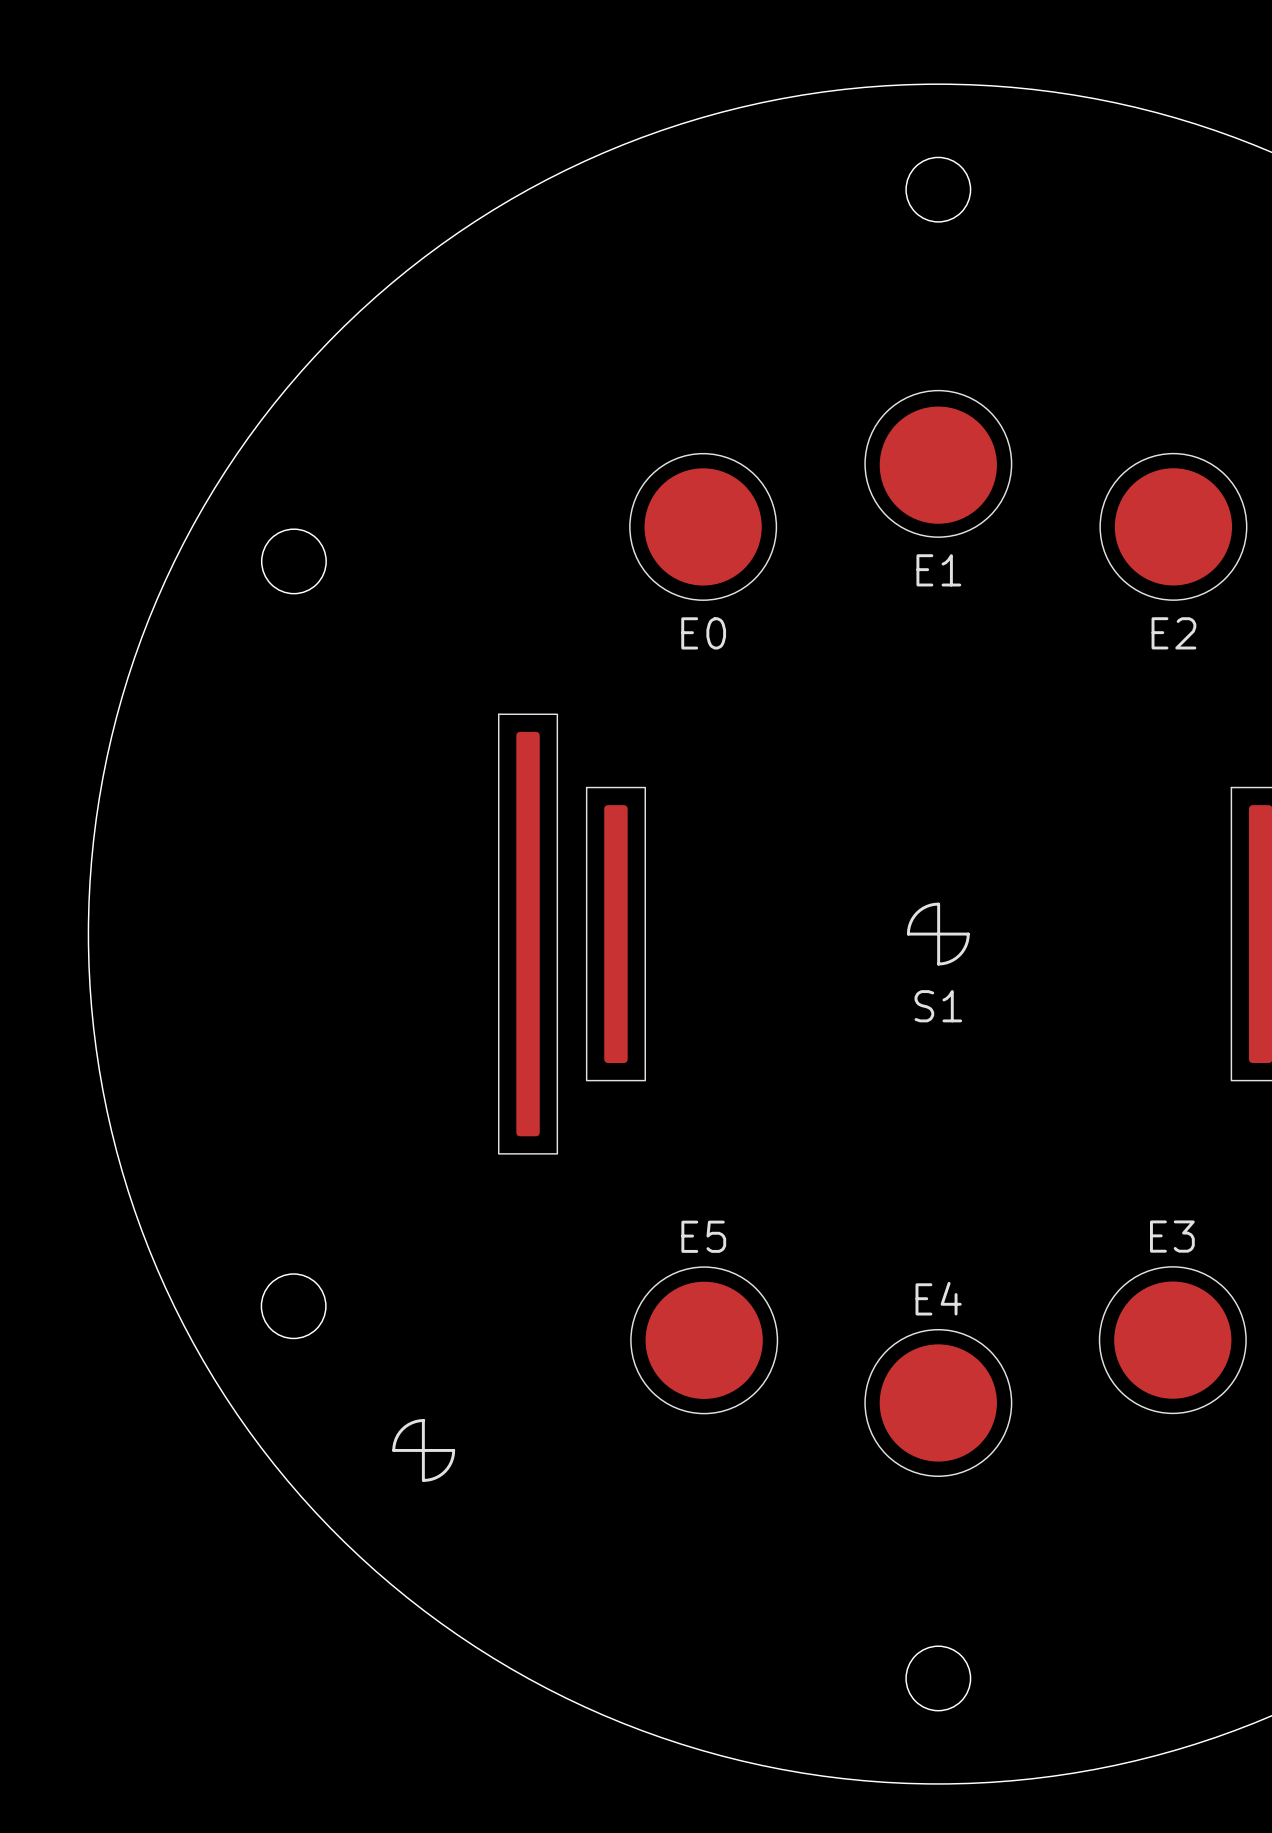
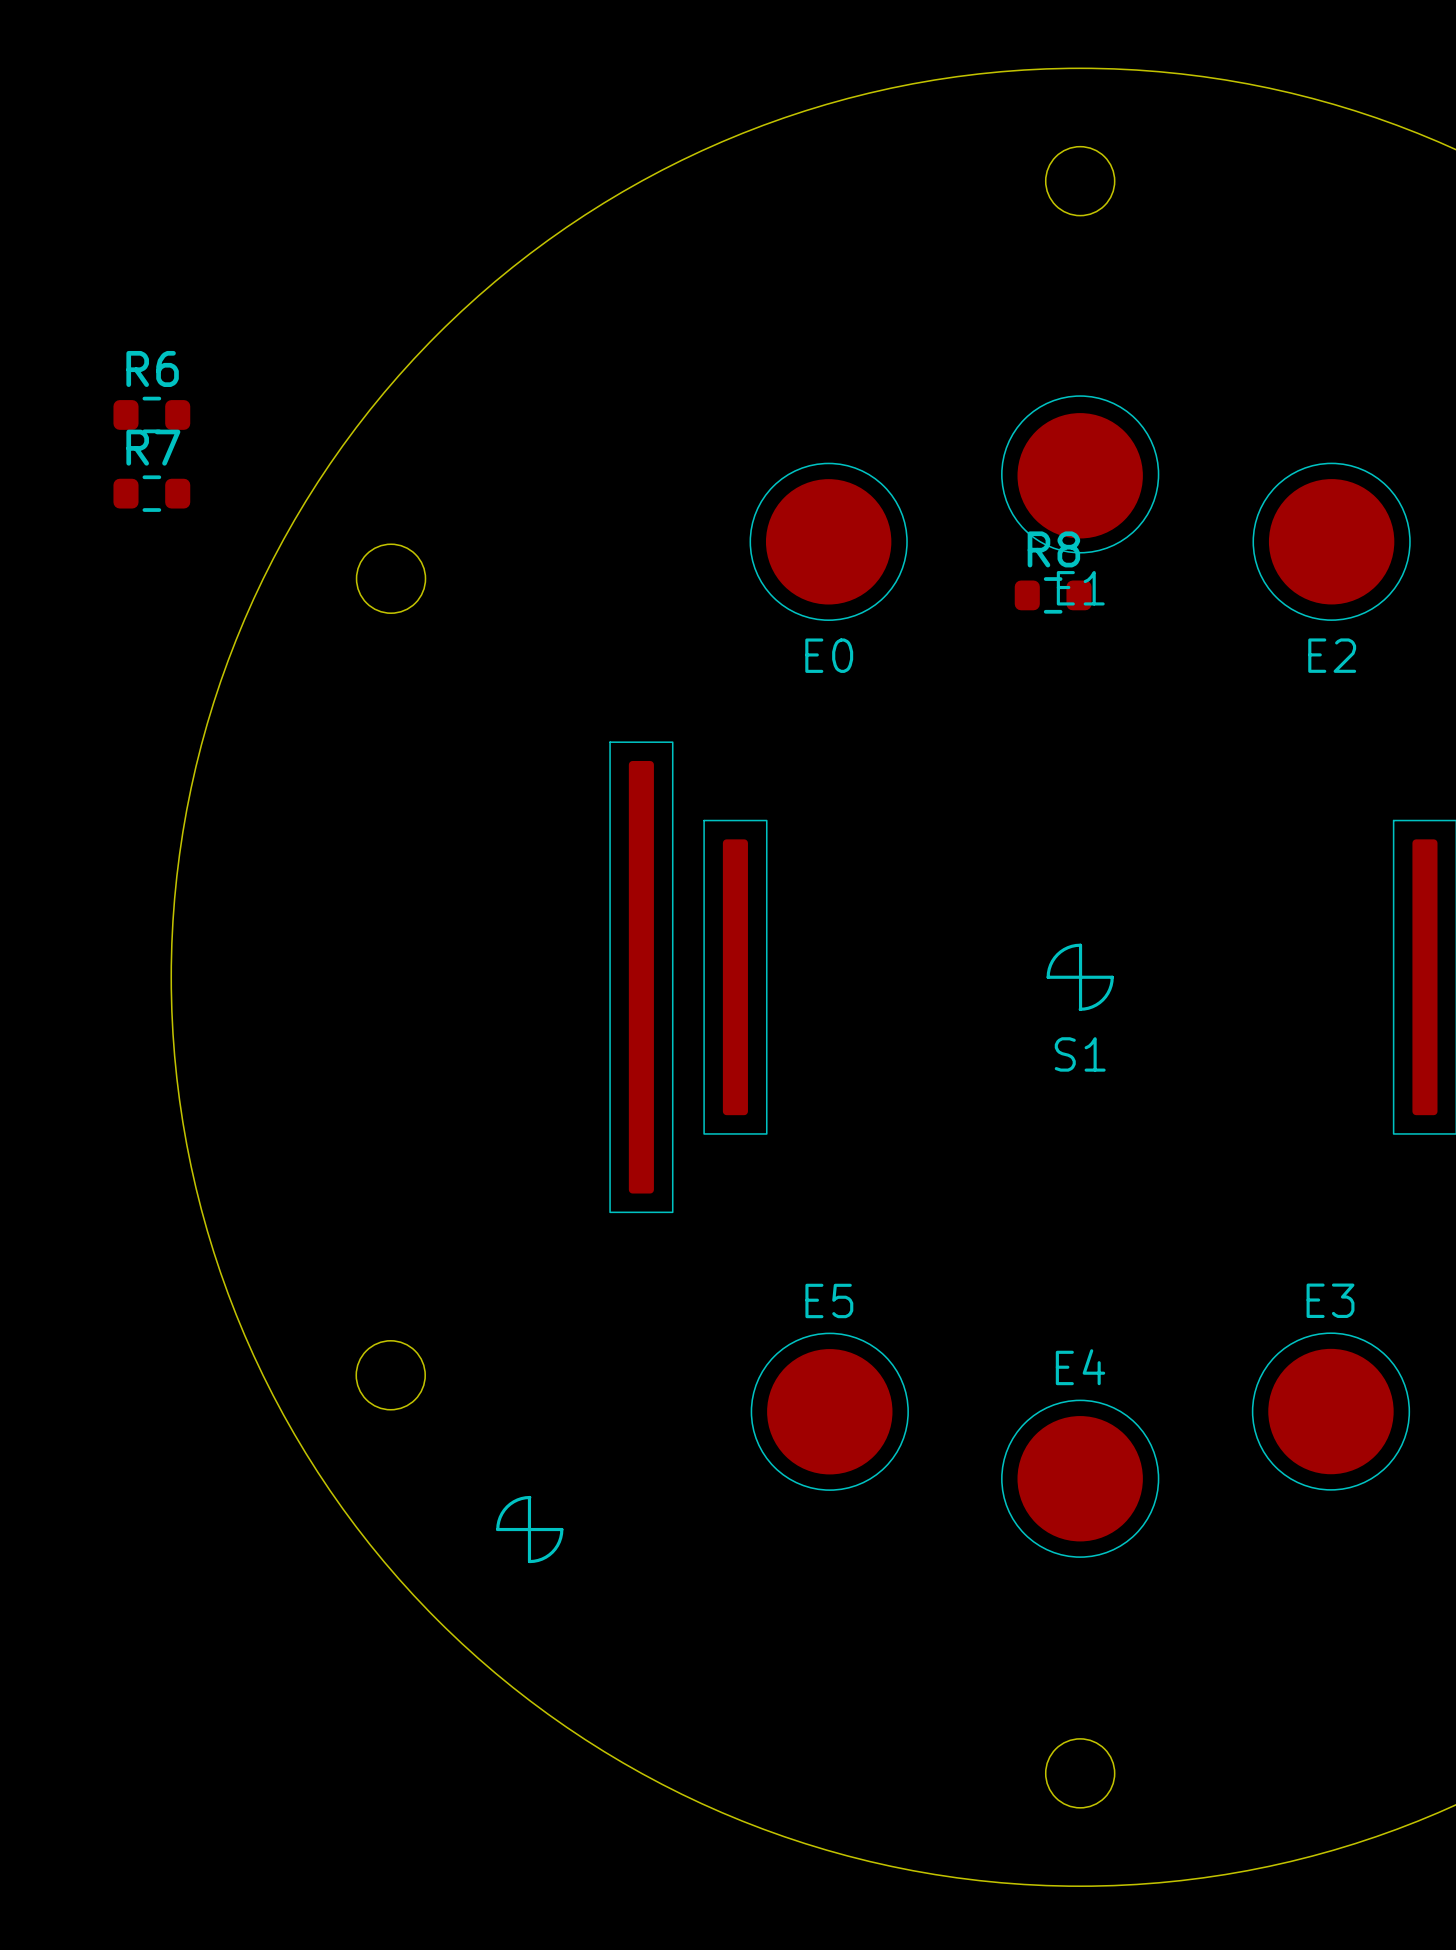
R6: none -> (151, 414)
R7: none -> (151, 493)
R8: none -> (1053, 595)

